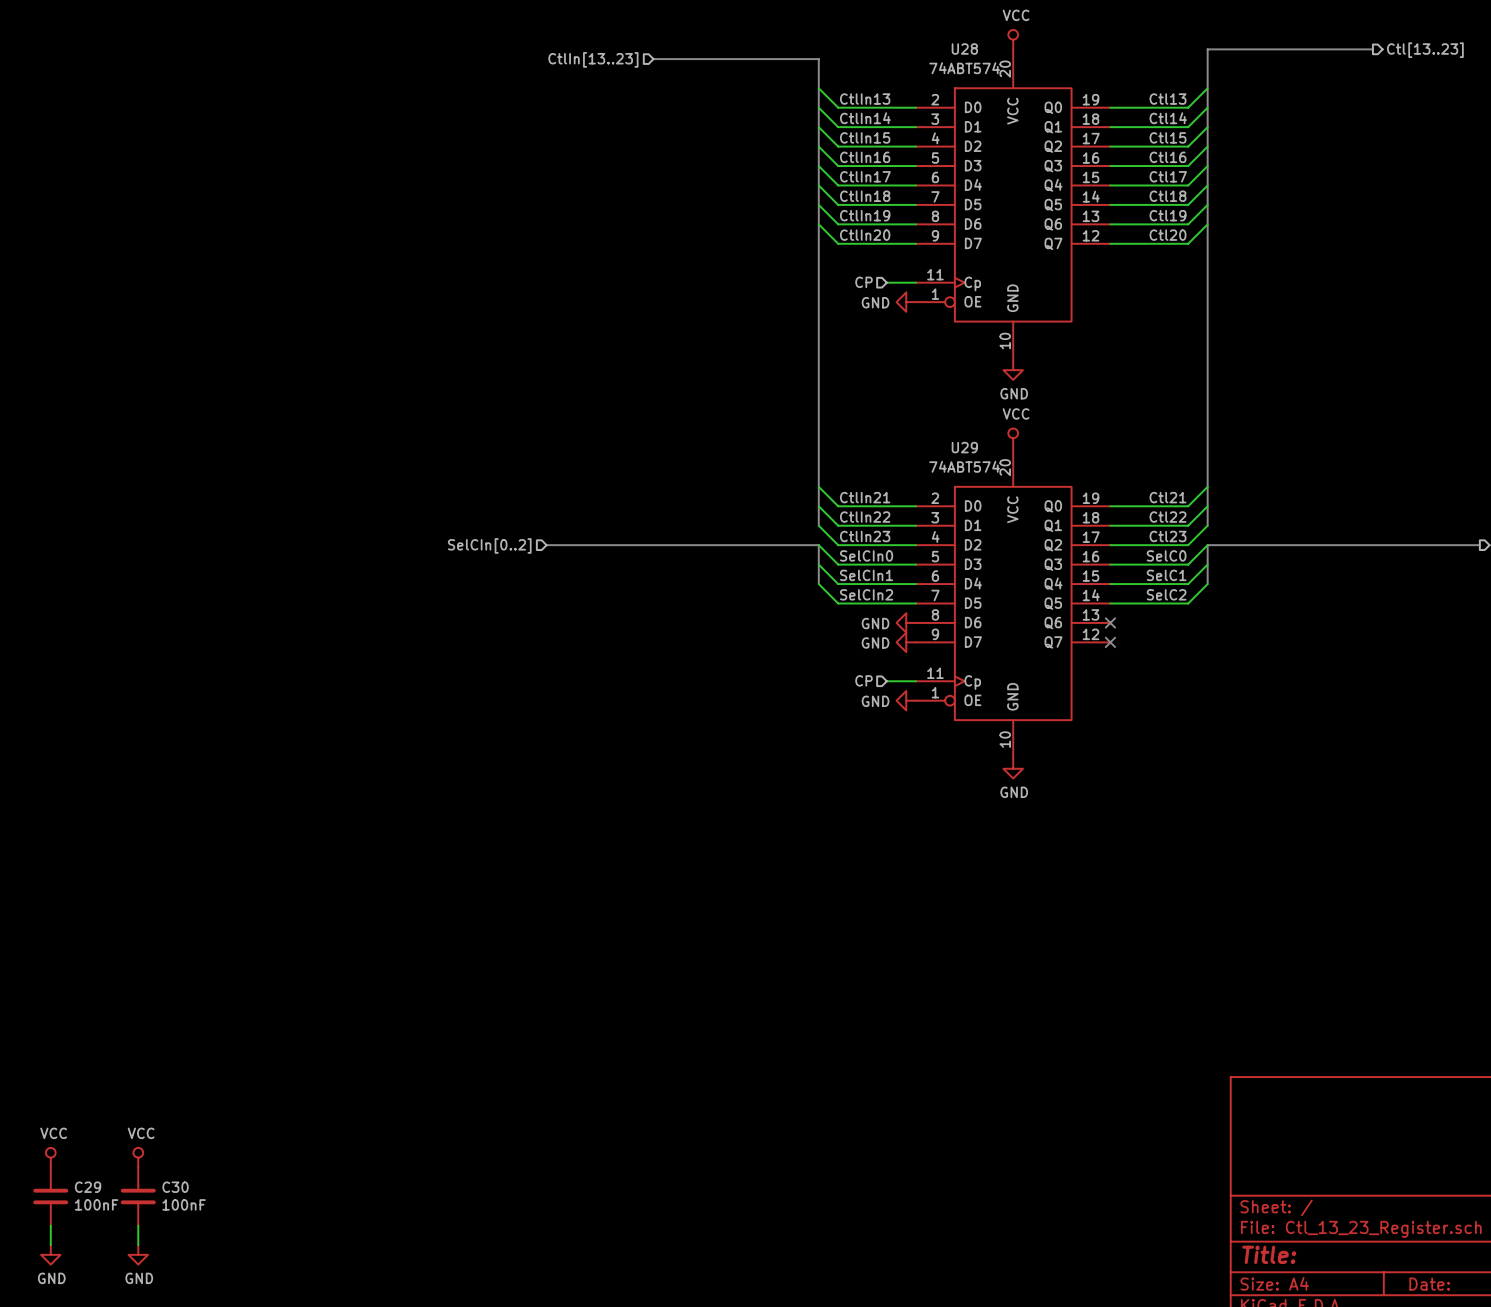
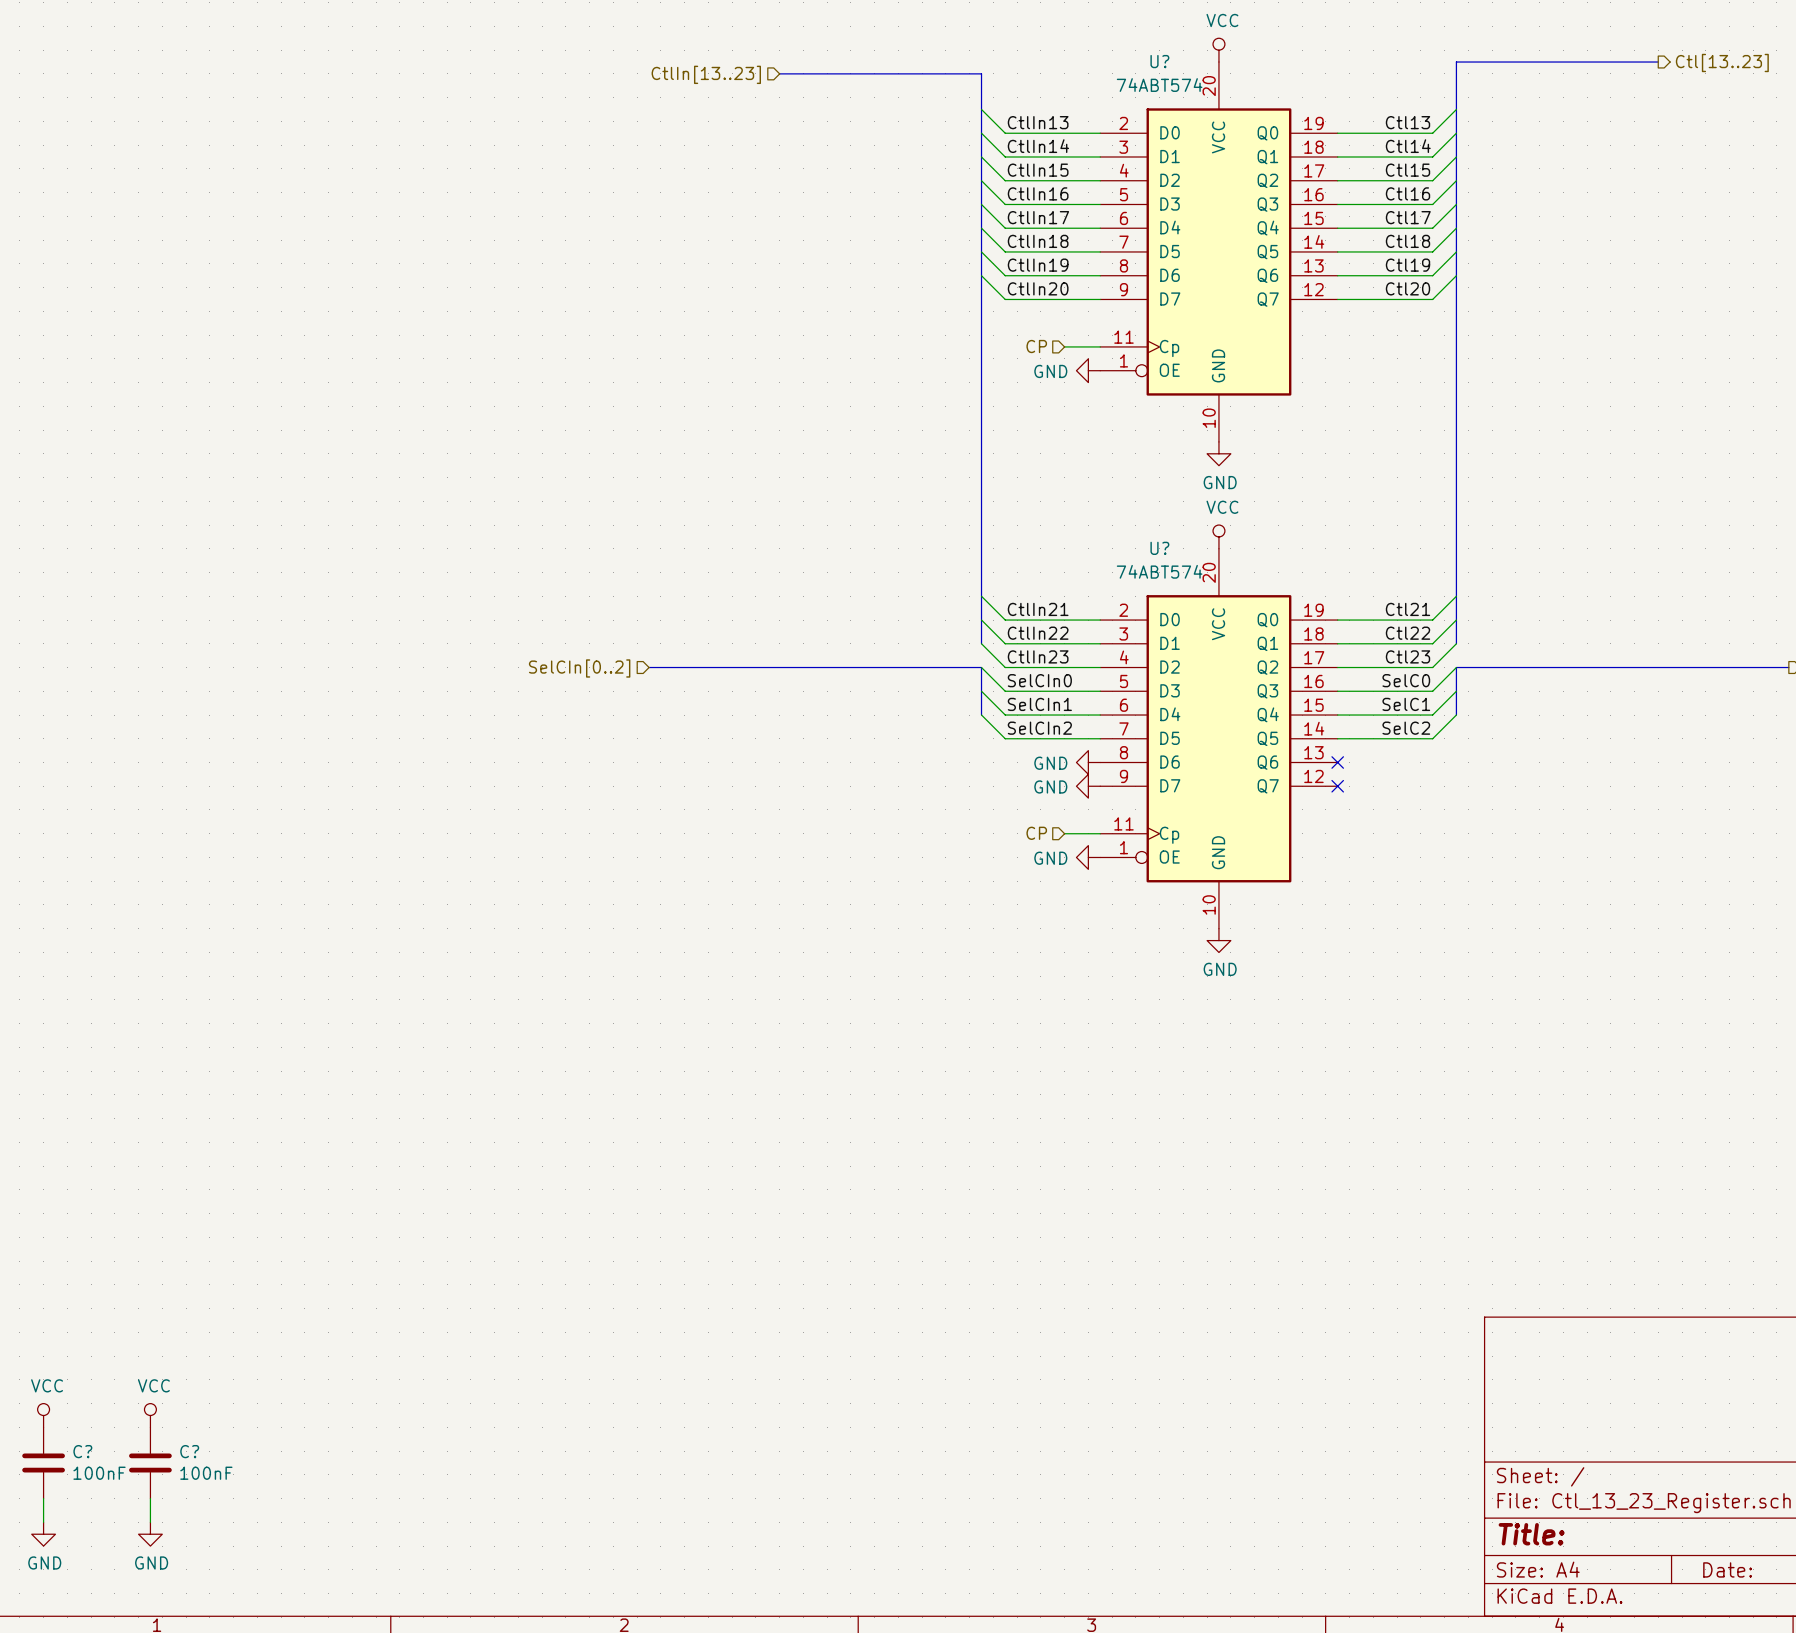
U28 name: U28 (964, 49) -> U? (1159, 61)
U29 name: U29 (964, 447) -> U? (1159, 548)
C29 name: C29 (88, 1187) -> C? (82, 1451)
C30 name: C30 (175, 1187) -> C? (189, 1451)

